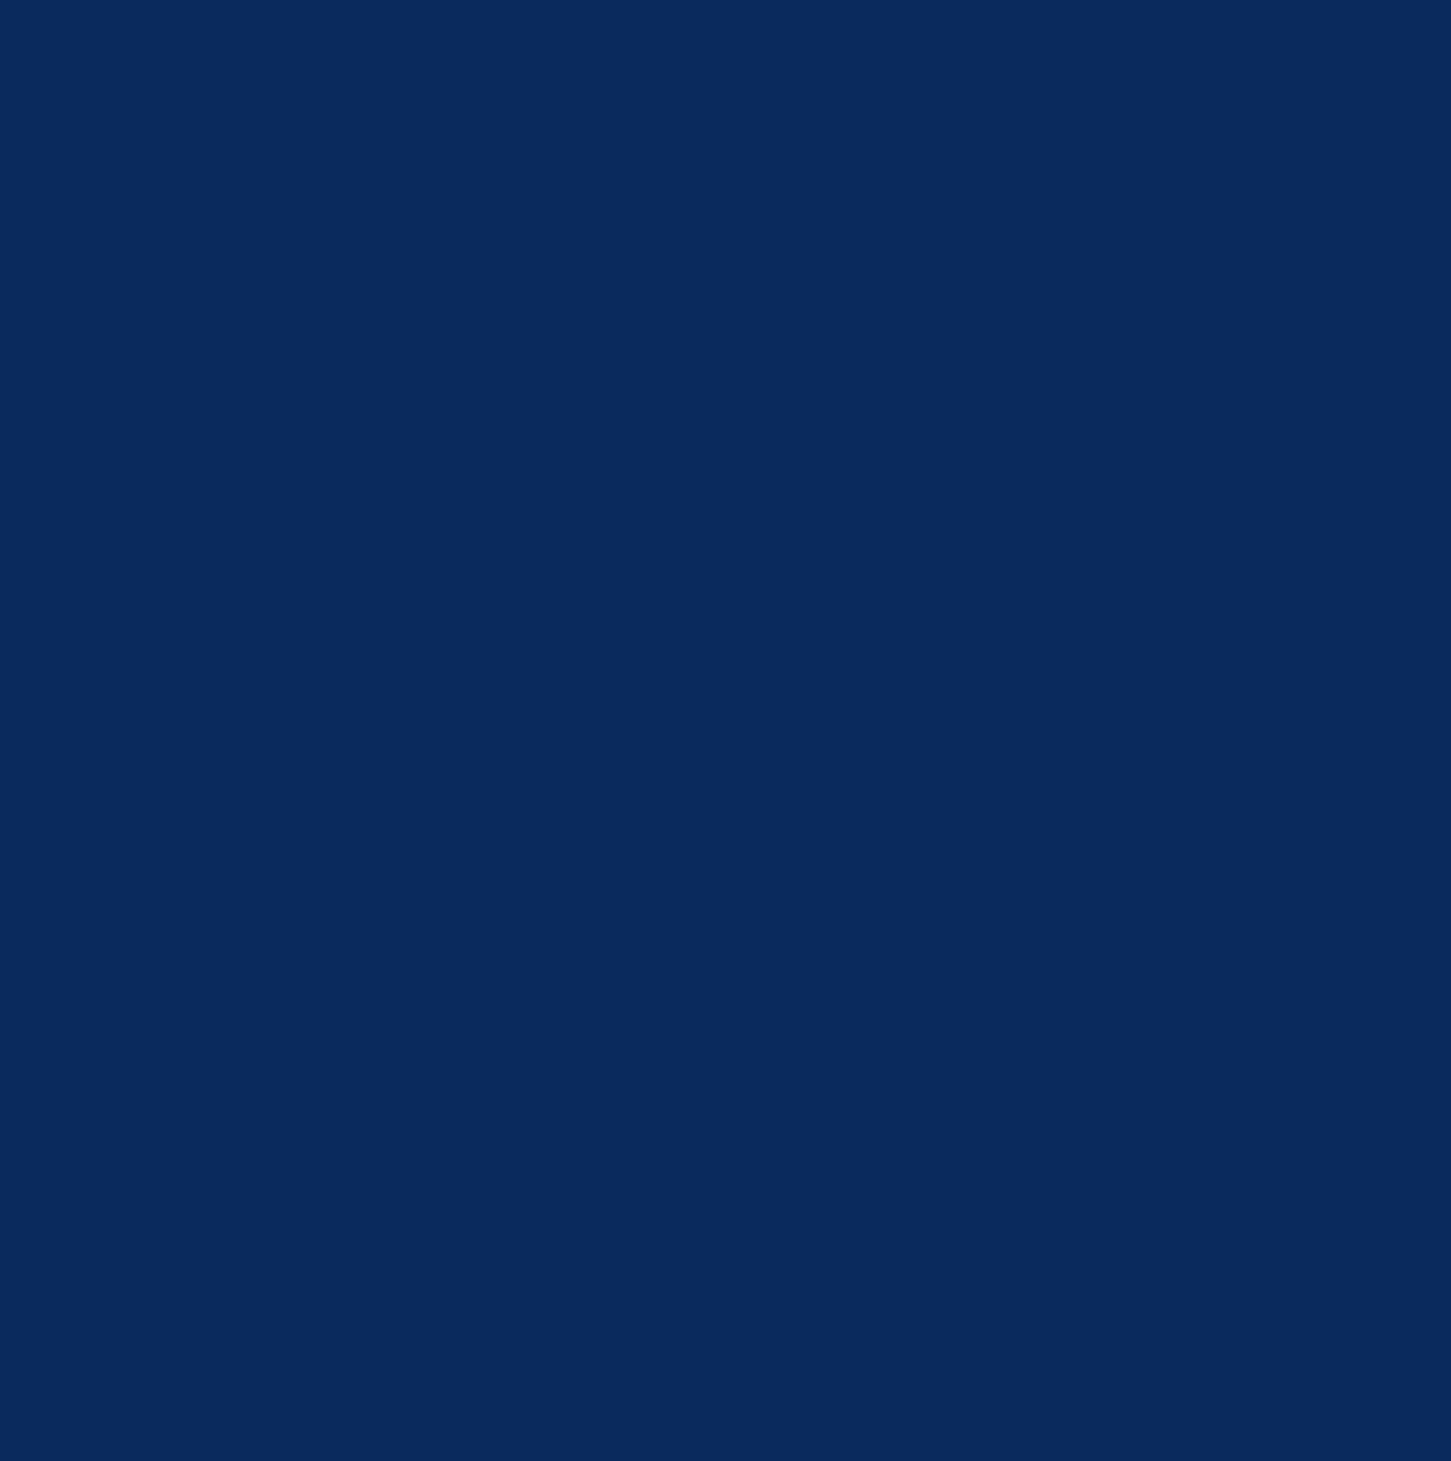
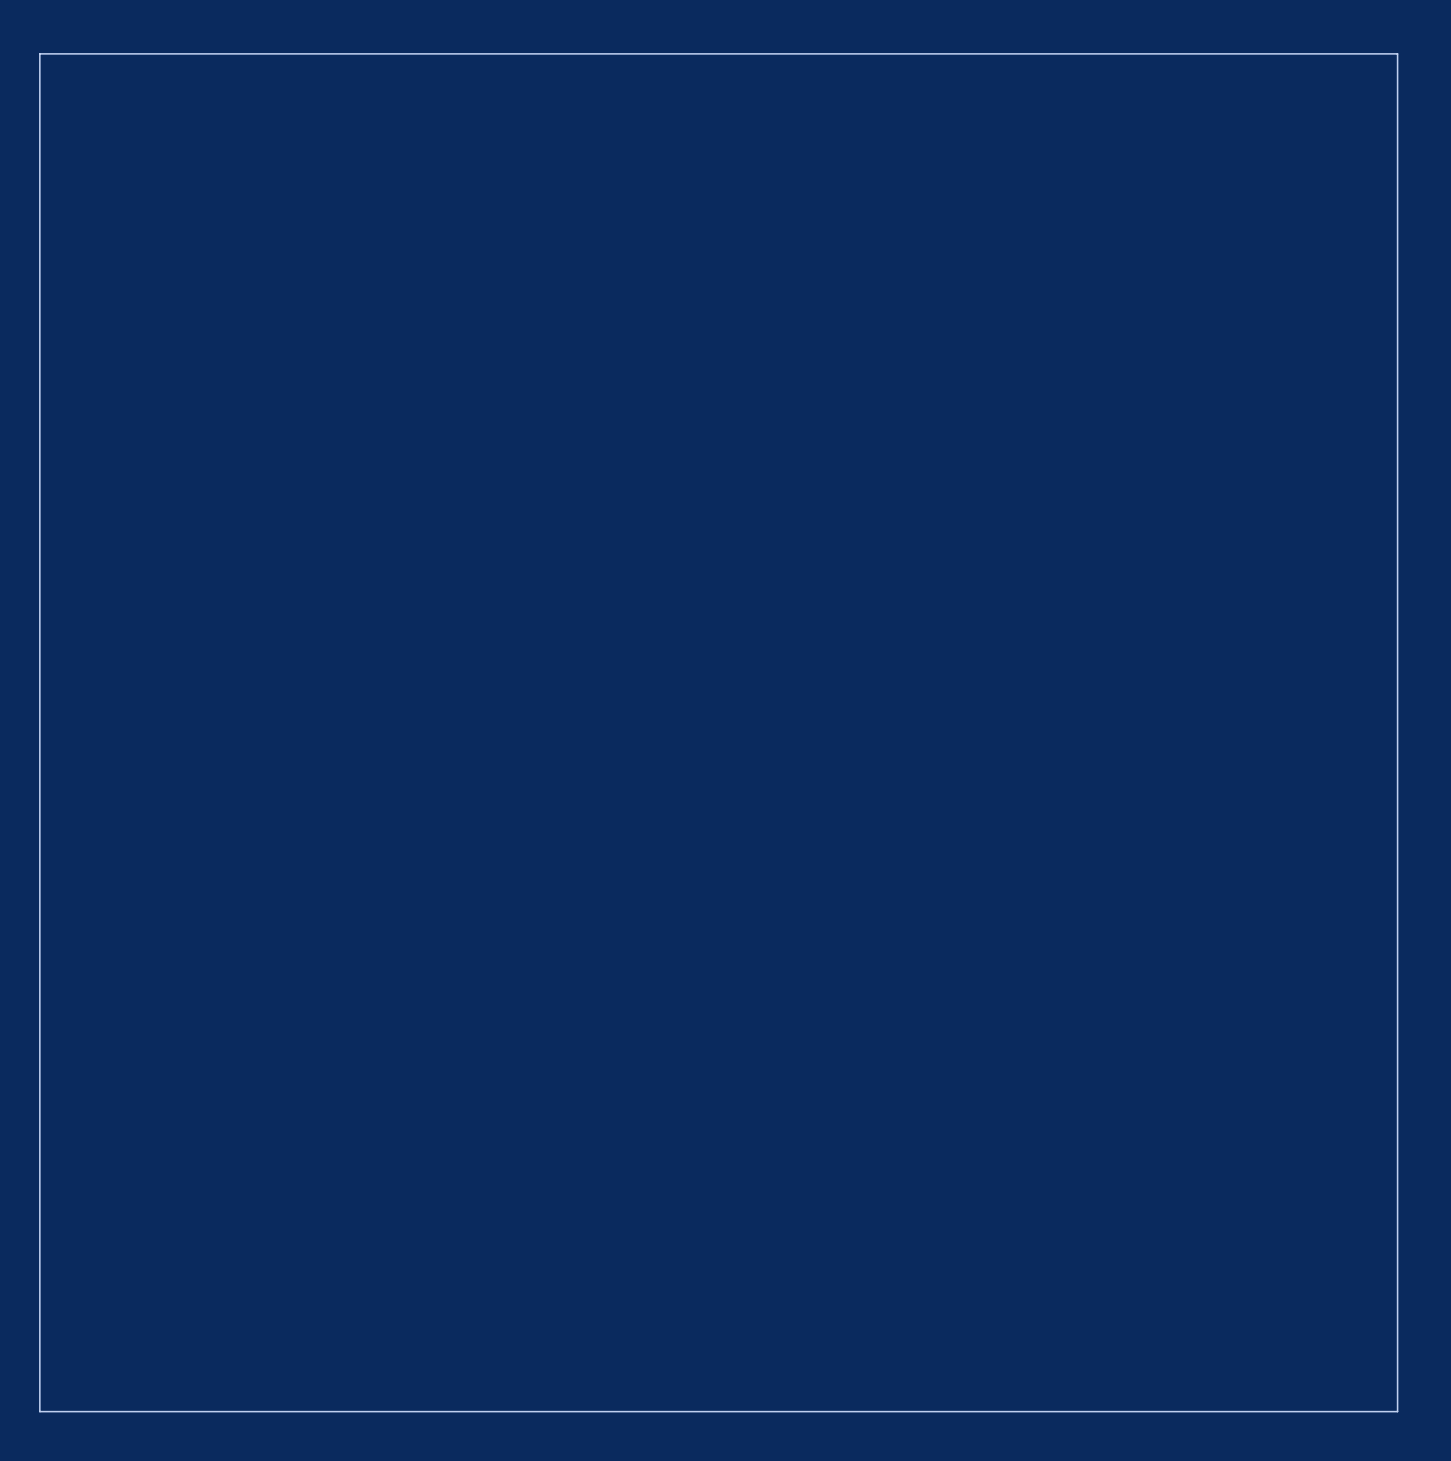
board edge: none -> (39, 53) (1397, 53) (1397, 1411) (39, 1411) (39, 53)

